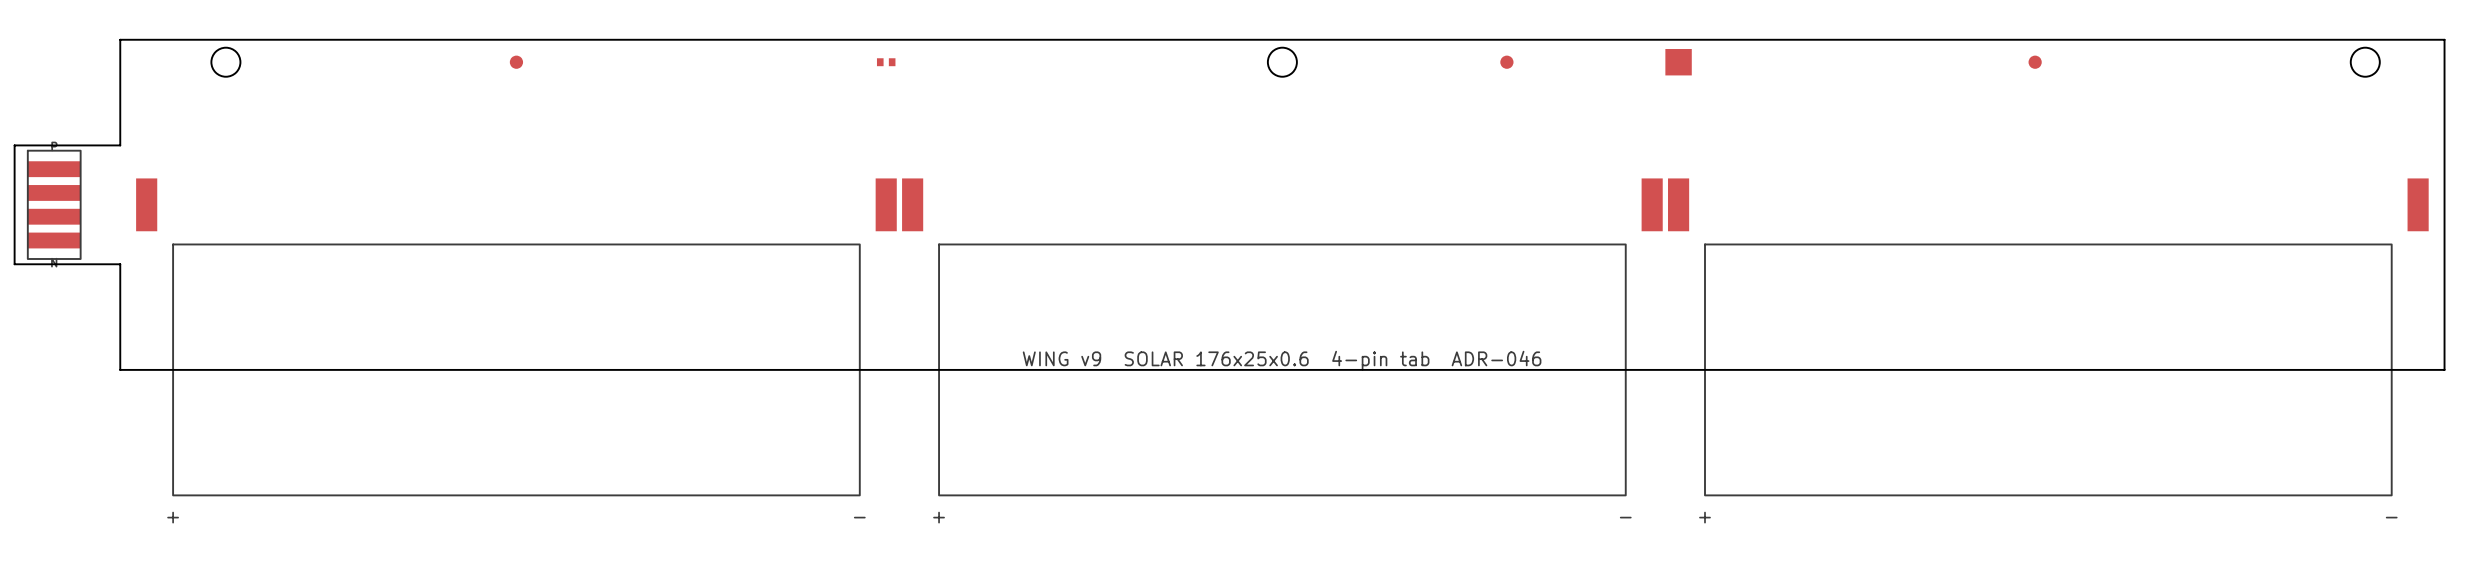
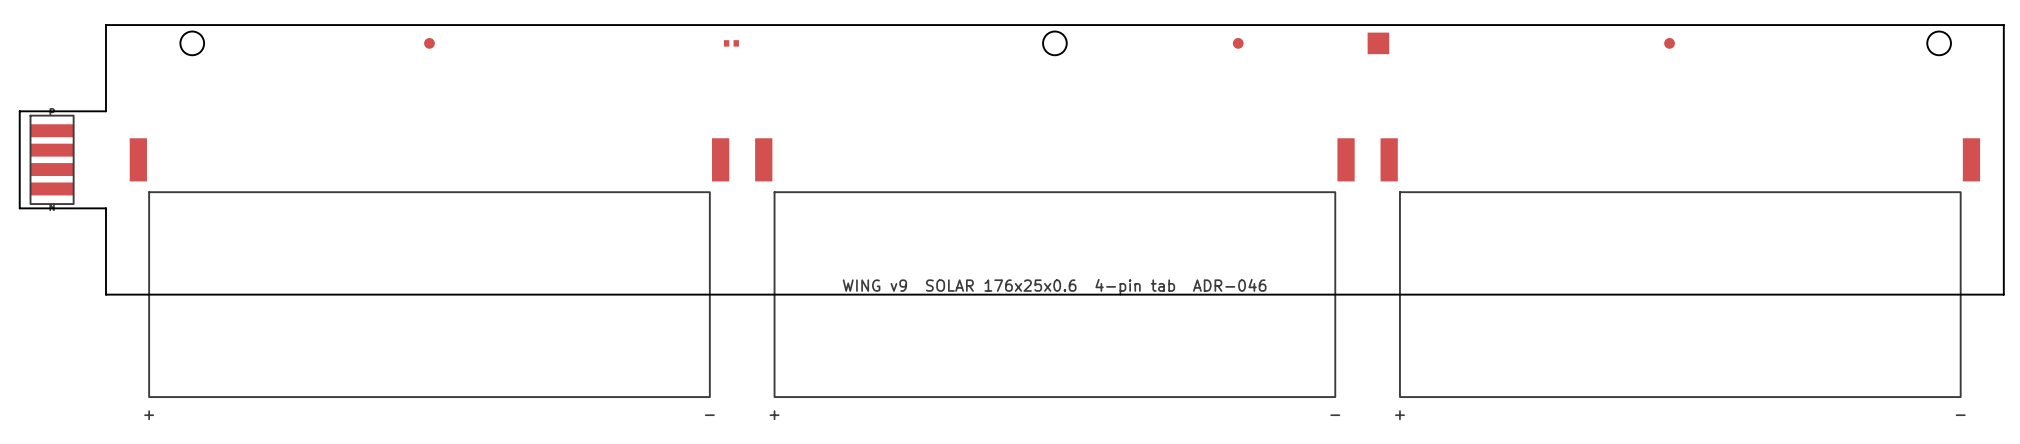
part footprint: [136, 178, 897, 497] -> [129, 138, 730, 398]
part footprint: [902, 178, 1663, 497] -> [755, 138, 1355, 398]
part footprint: [1668, 178, 2429, 497] -> [1380, 138, 1981, 398]

